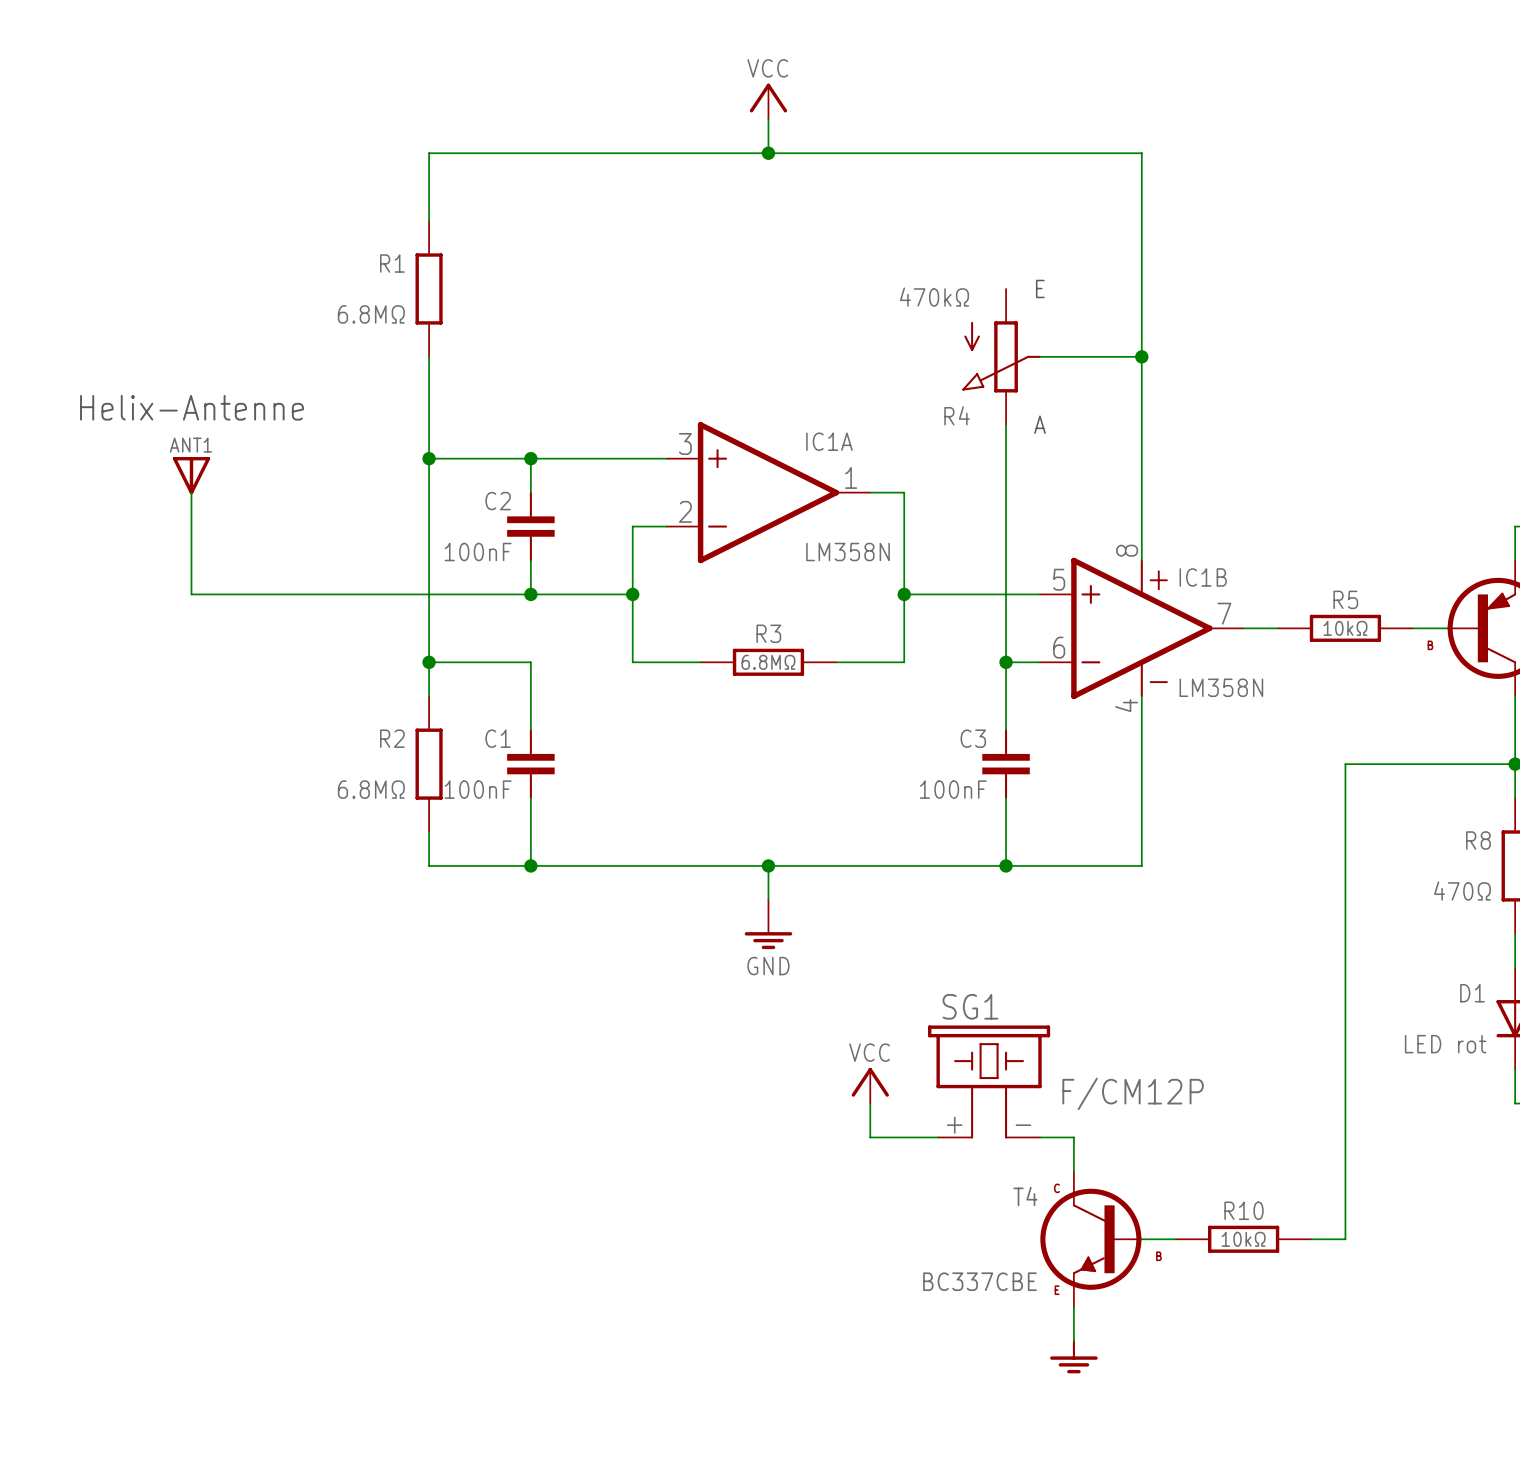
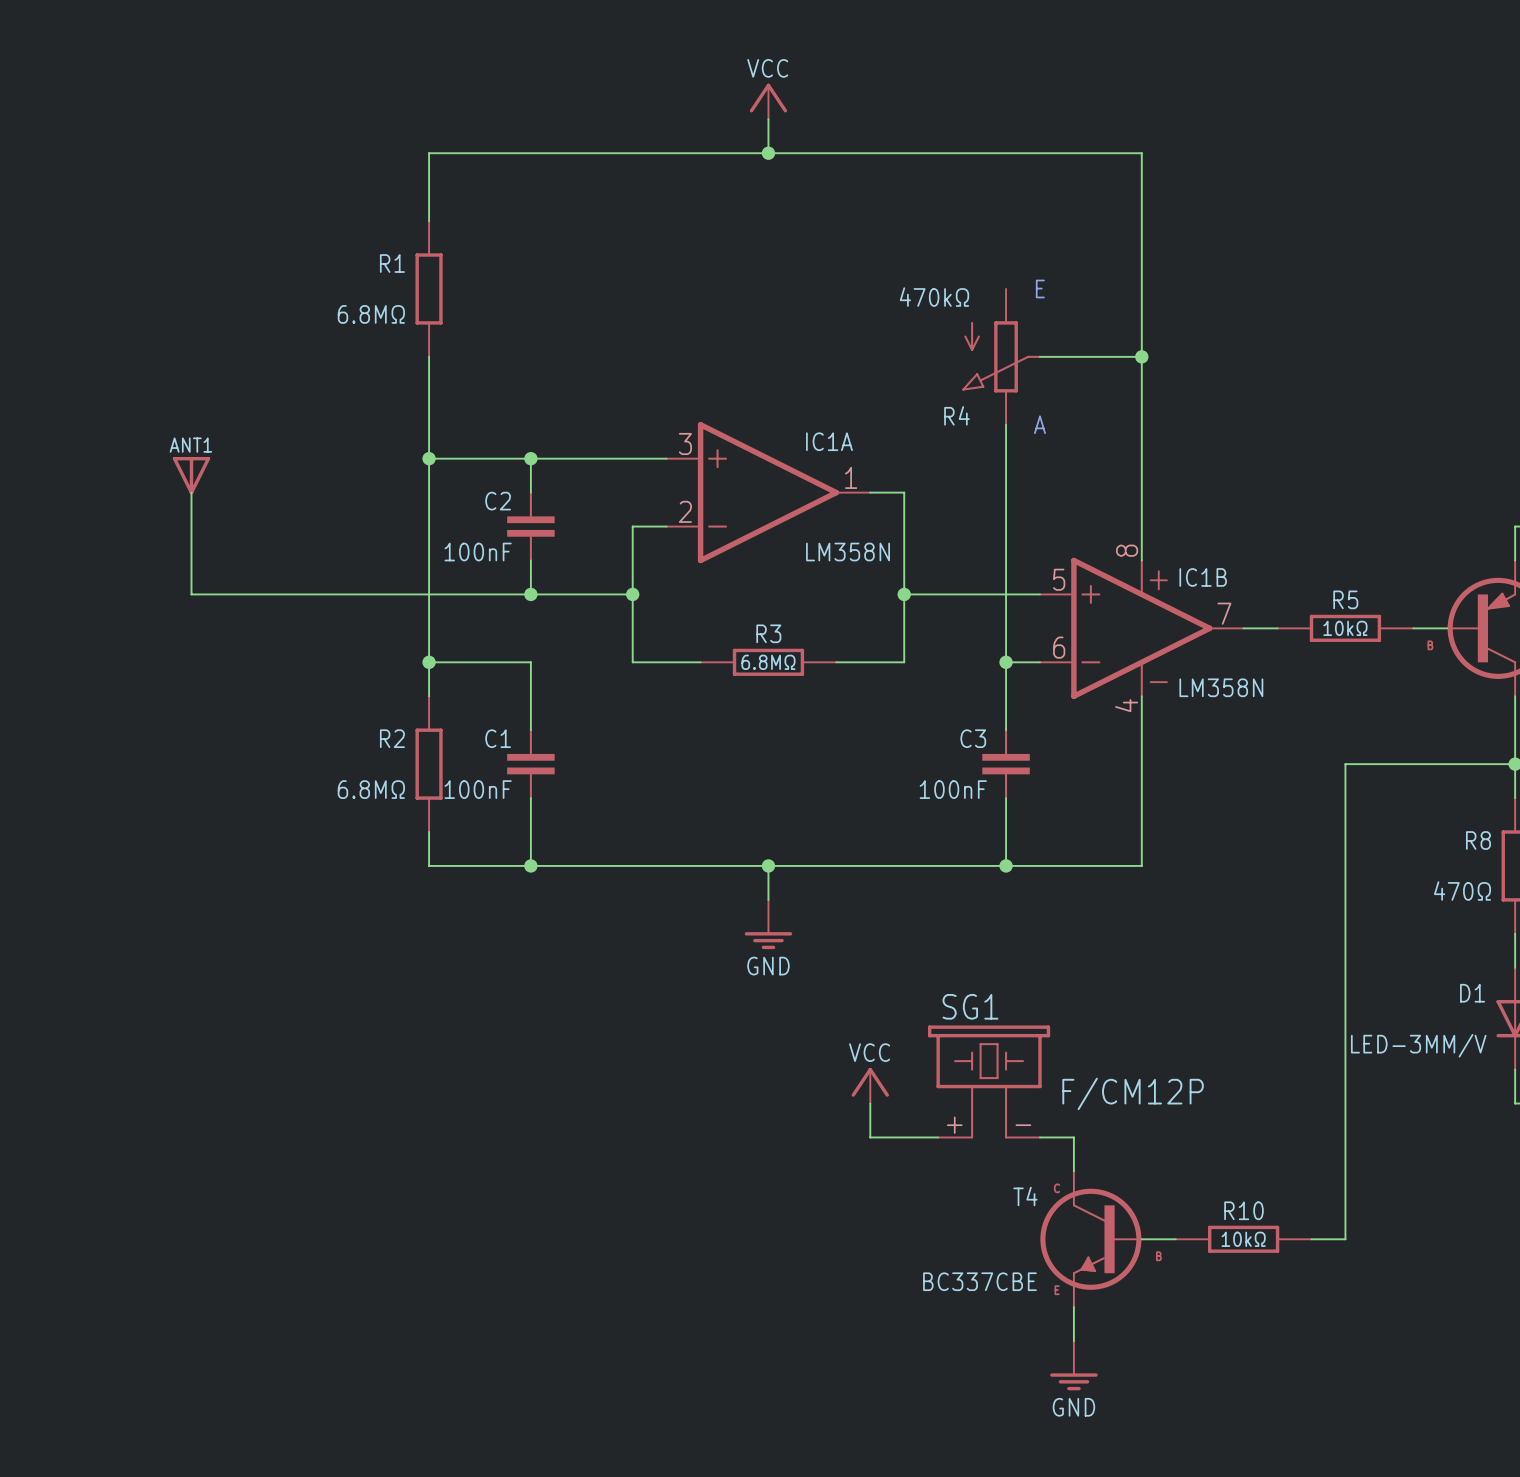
text: Helix-Antenne (192, 407) -> none
D1 value: LED rot (1445, 1044) -> LED-3MM/V (1418, 1045)
power symbol: (1073, 1356) -> none
part: none -> (1073, 1365)

